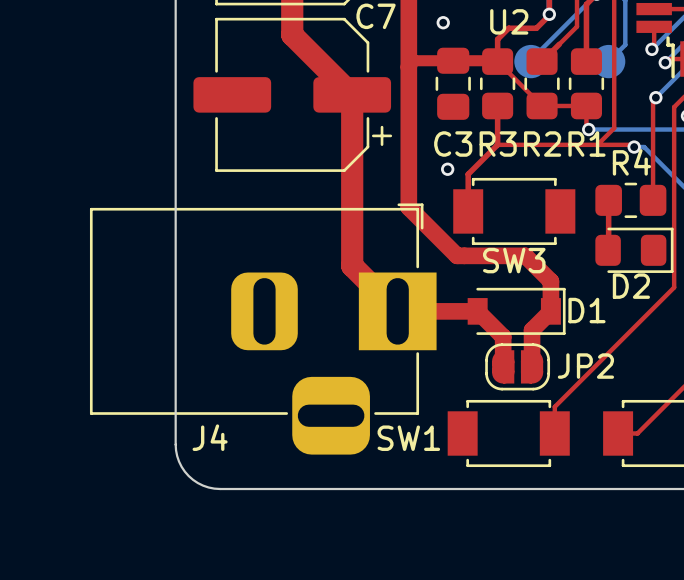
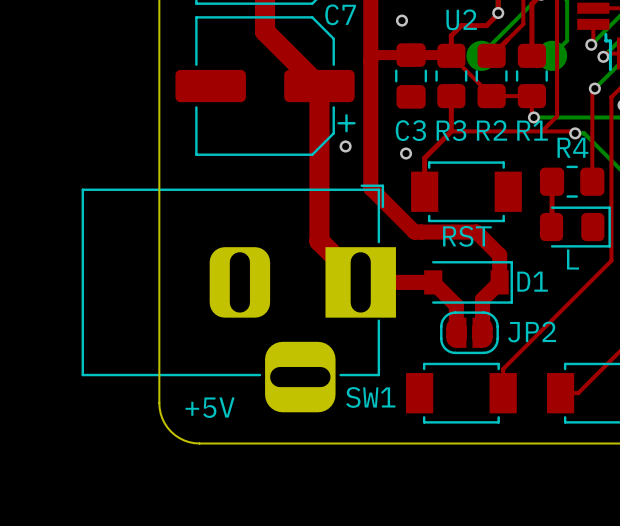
via: none -> (345, 146)
SW3 name: SW3 (514, 260) -> RST (467, 236)
D2 name: D2 (631, 286) -> L (572, 259)
J4 name: J4 (210, 437) -> +5V (210, 407)

